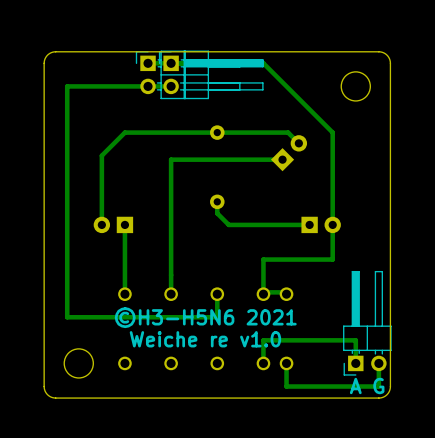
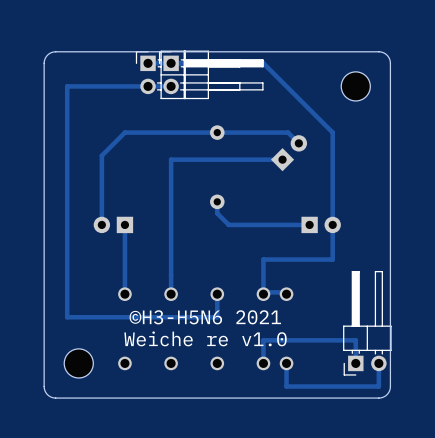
text: A (355, 386) -> none
text: G (378, 386) -> none

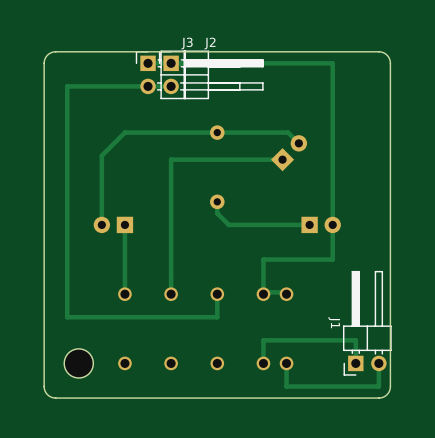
J3 name: none -> J3 (187, 43)
J2 name: none -> J2 (210, 43)
track: (263, 63) (332, 132) -> (263, 63) (332, 63) (332, 132)
part: (355, 86) -> none
text: ©H3-H5N6 2021 (205, 317) -> none
J1 name: none -> J1 (334, 322)
text: Weiche re v1.0 (205, 338) -> none

